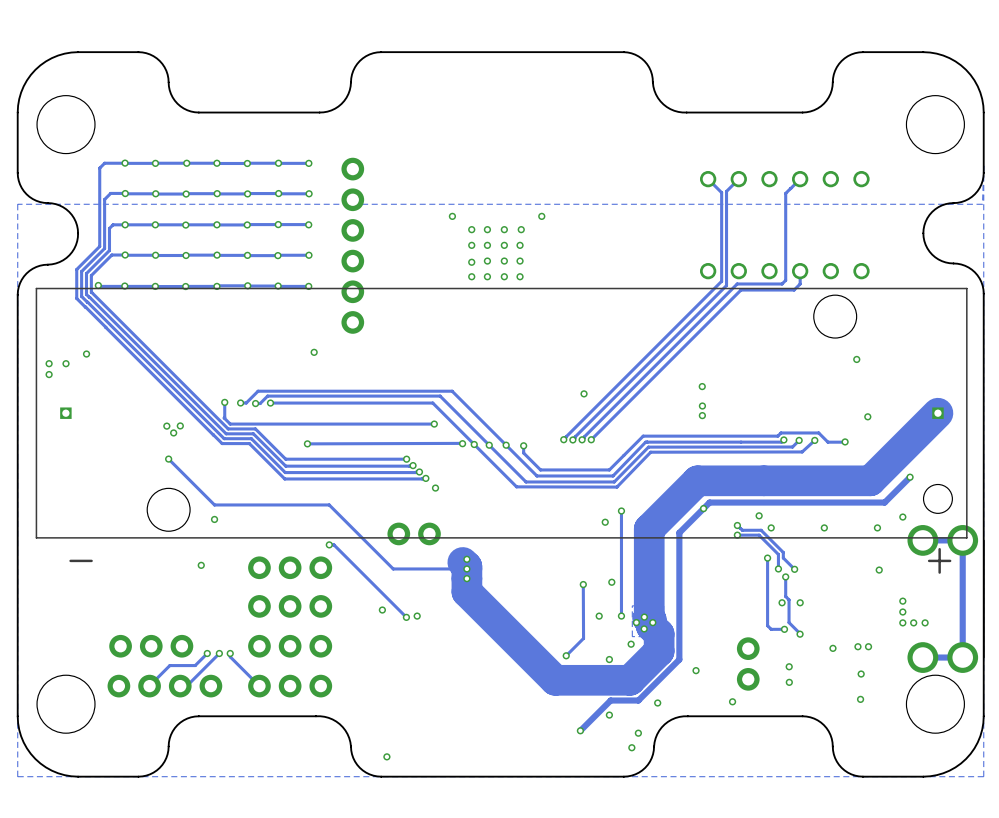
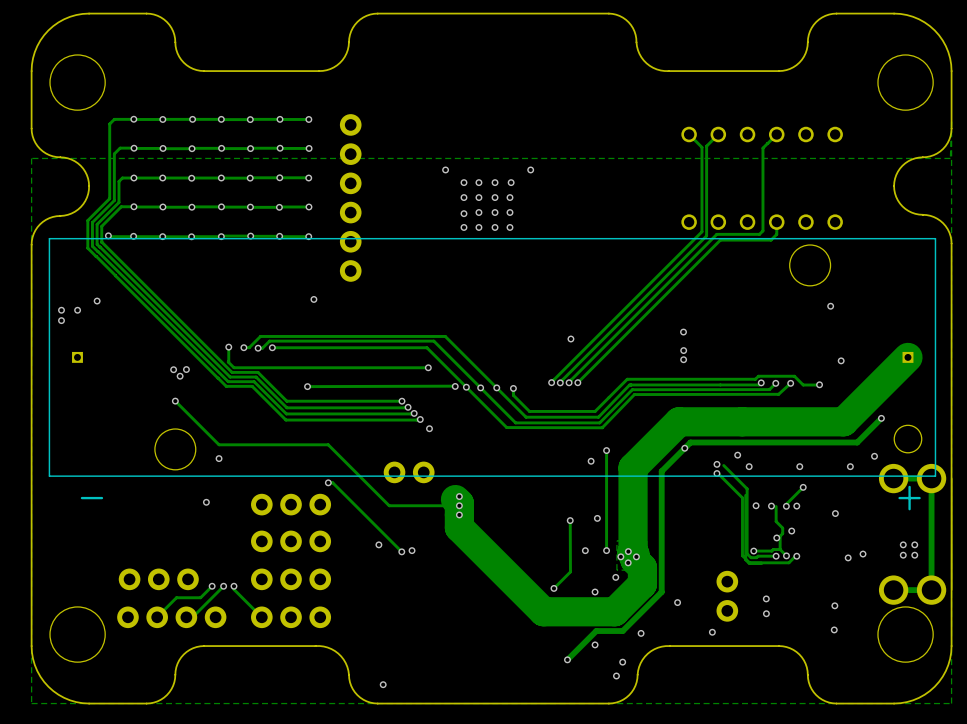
track: none -> (723, 465) (747, 488) (747, 553) (751, 557) (776, 556)
track: (740, 528) (742, 530) (761, 530) (783, 552) (783, 558) (794, 569) -> none
track: (737, 535) (759, 535) (778, 554) (778, 568) -> none
track: none -> (719, 474) (742, 497) (742, 555) (749, 562) (788, 562) (796, 556)
track: none -> (803, 487) (786, 506)
via: none -> (803, 487)
via: (767, 558) -> none
track: none -> (776, 506) (776, 521) (782, 528) (782, 533) (780, 536) (780, 549)
via: none -> (786, 506)
via: none -> (796, 506)
via position: (879, 570) -> (835, 513)
track: (785, 576) (785, 596) (789, 599) (789, 622) (800, 634) -> none
via: (785, 576) -> none
via: none -> (791, 531)
via: (902, 601) -> none
via: (782, 602) -> none
via: none -> (903, 544)
via: none -> (914, 544)
via: (902, 612) -> none
track: none -> (780, 549) (786, 555)
track: none -> (780, 549) (753, 551)
via: none -> (753, 551)
via: none -> (863, 554)
via: none -> (903, 555)
via: none -> (914, 555)
via: none -> (776, 556)
via: none -> (786, 555)
via: none -> (796, 556)
via: (902, 622) -> none
via: (913, 622) -> none
via: (925, 622) -> none
via: none -> (848, 557)
via: (784, 629) -> none
via: (800, 634) -> none
via: (857, 646) -> none
via: (868, 646) -> none
via: (832, 648) -> none

